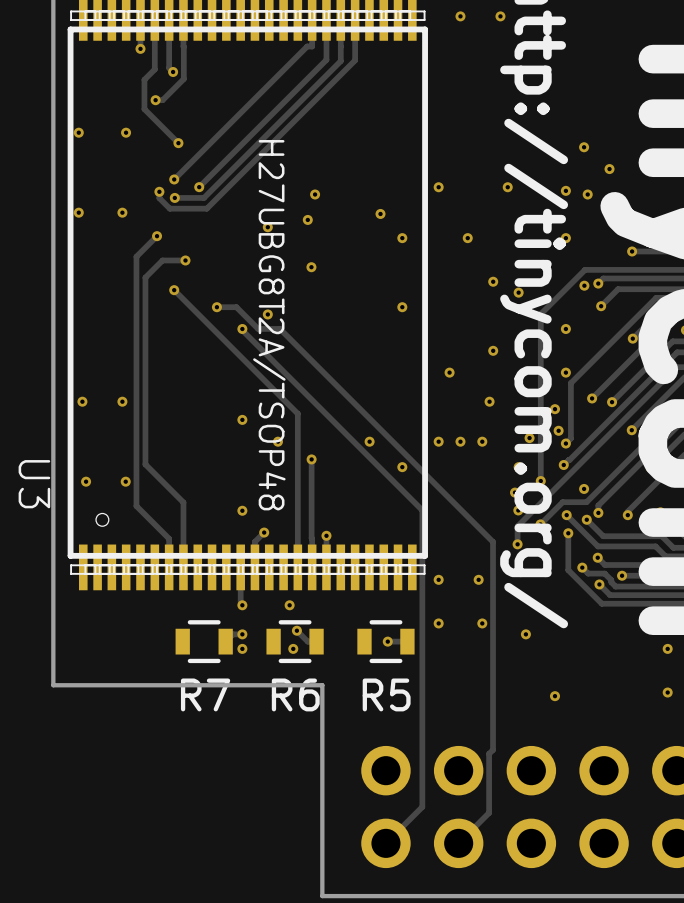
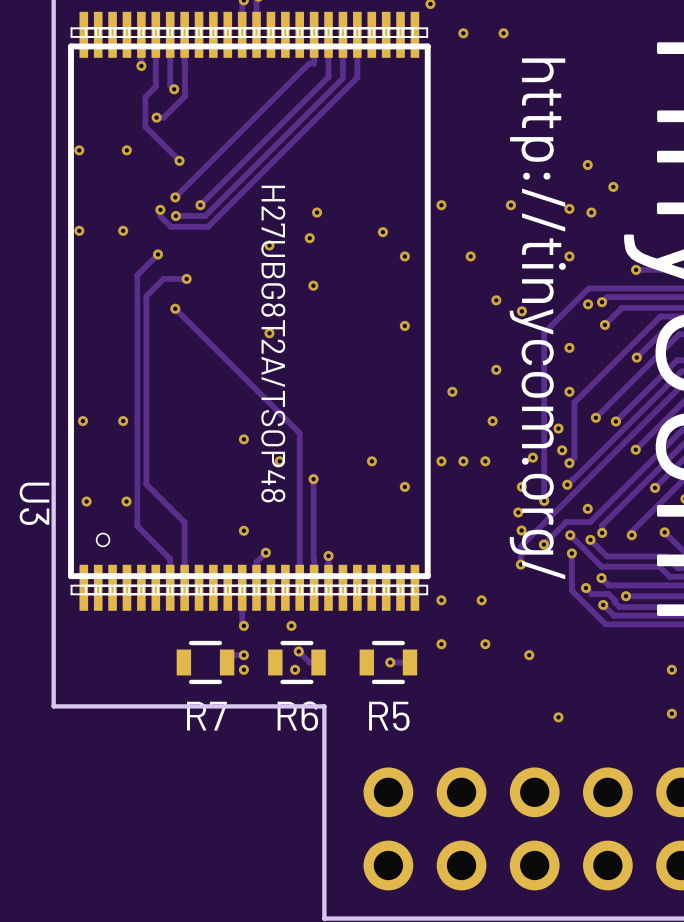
track: (216, 307) (236, 307) (258, 328) (280, 328) (493, 541) (493, 749) (489, 753) (489, 812) (458, 843) -> none
via: (216, 307) -> none
track: (242, 329) (422, 510) (422, 806) (385, 843) -> none
via: (242, 329) -> none

